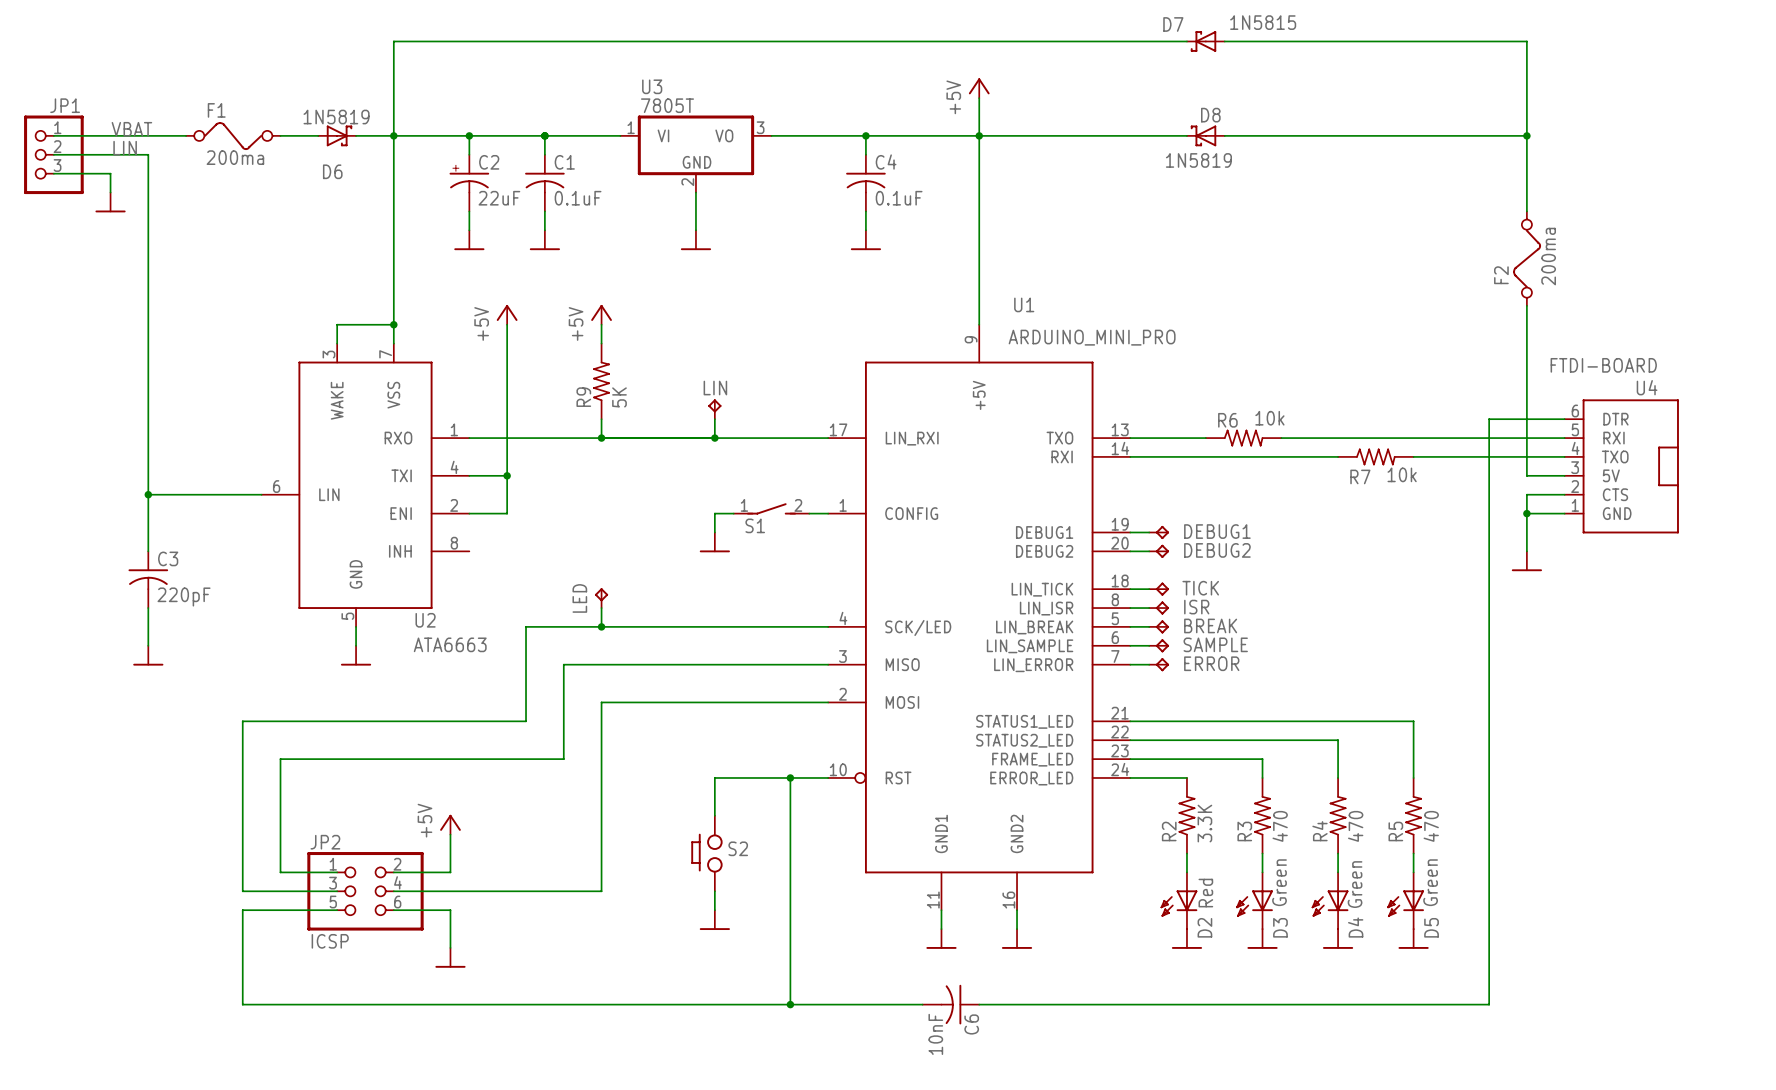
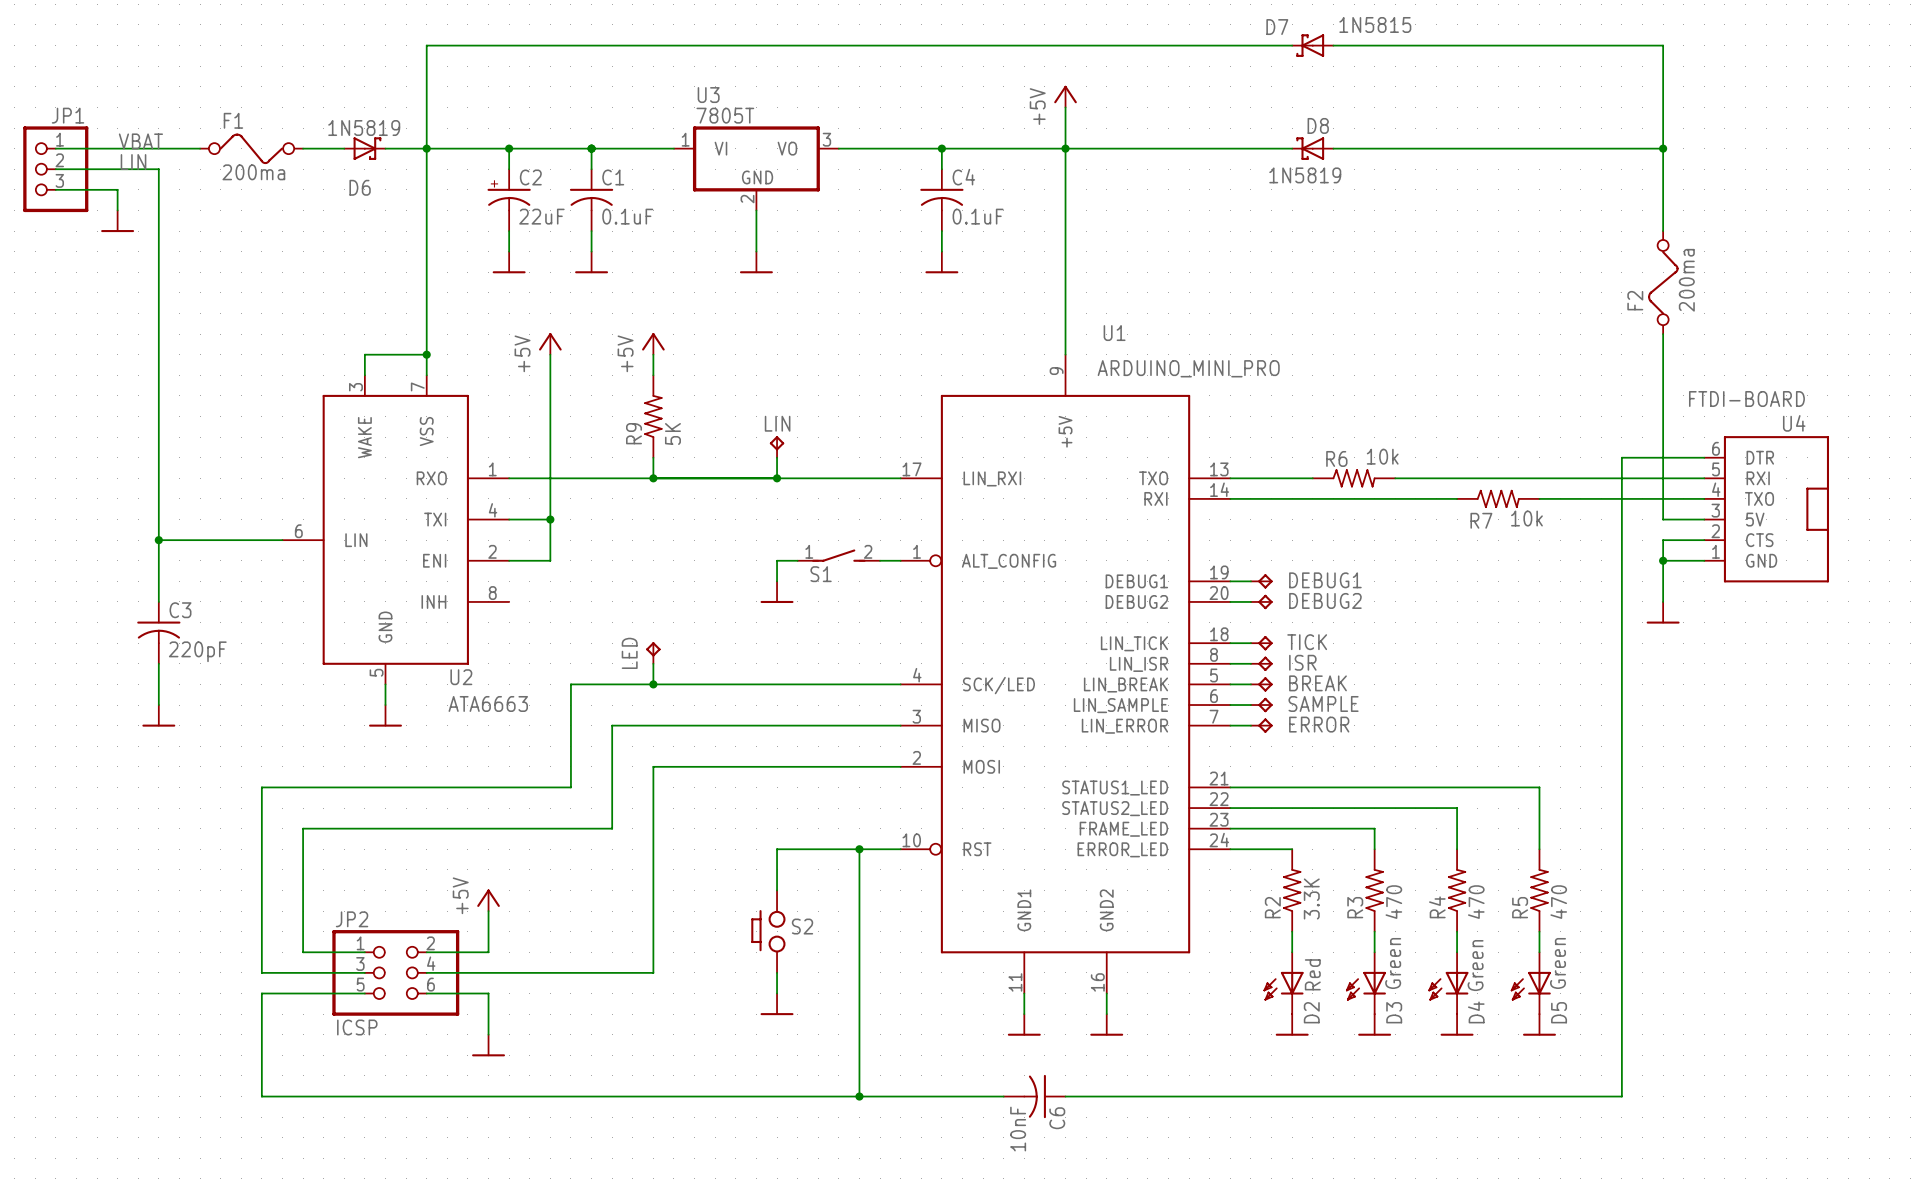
U1 symbol: [828, 324, 1131, 911] -> [900, 354, 1231, 994]

